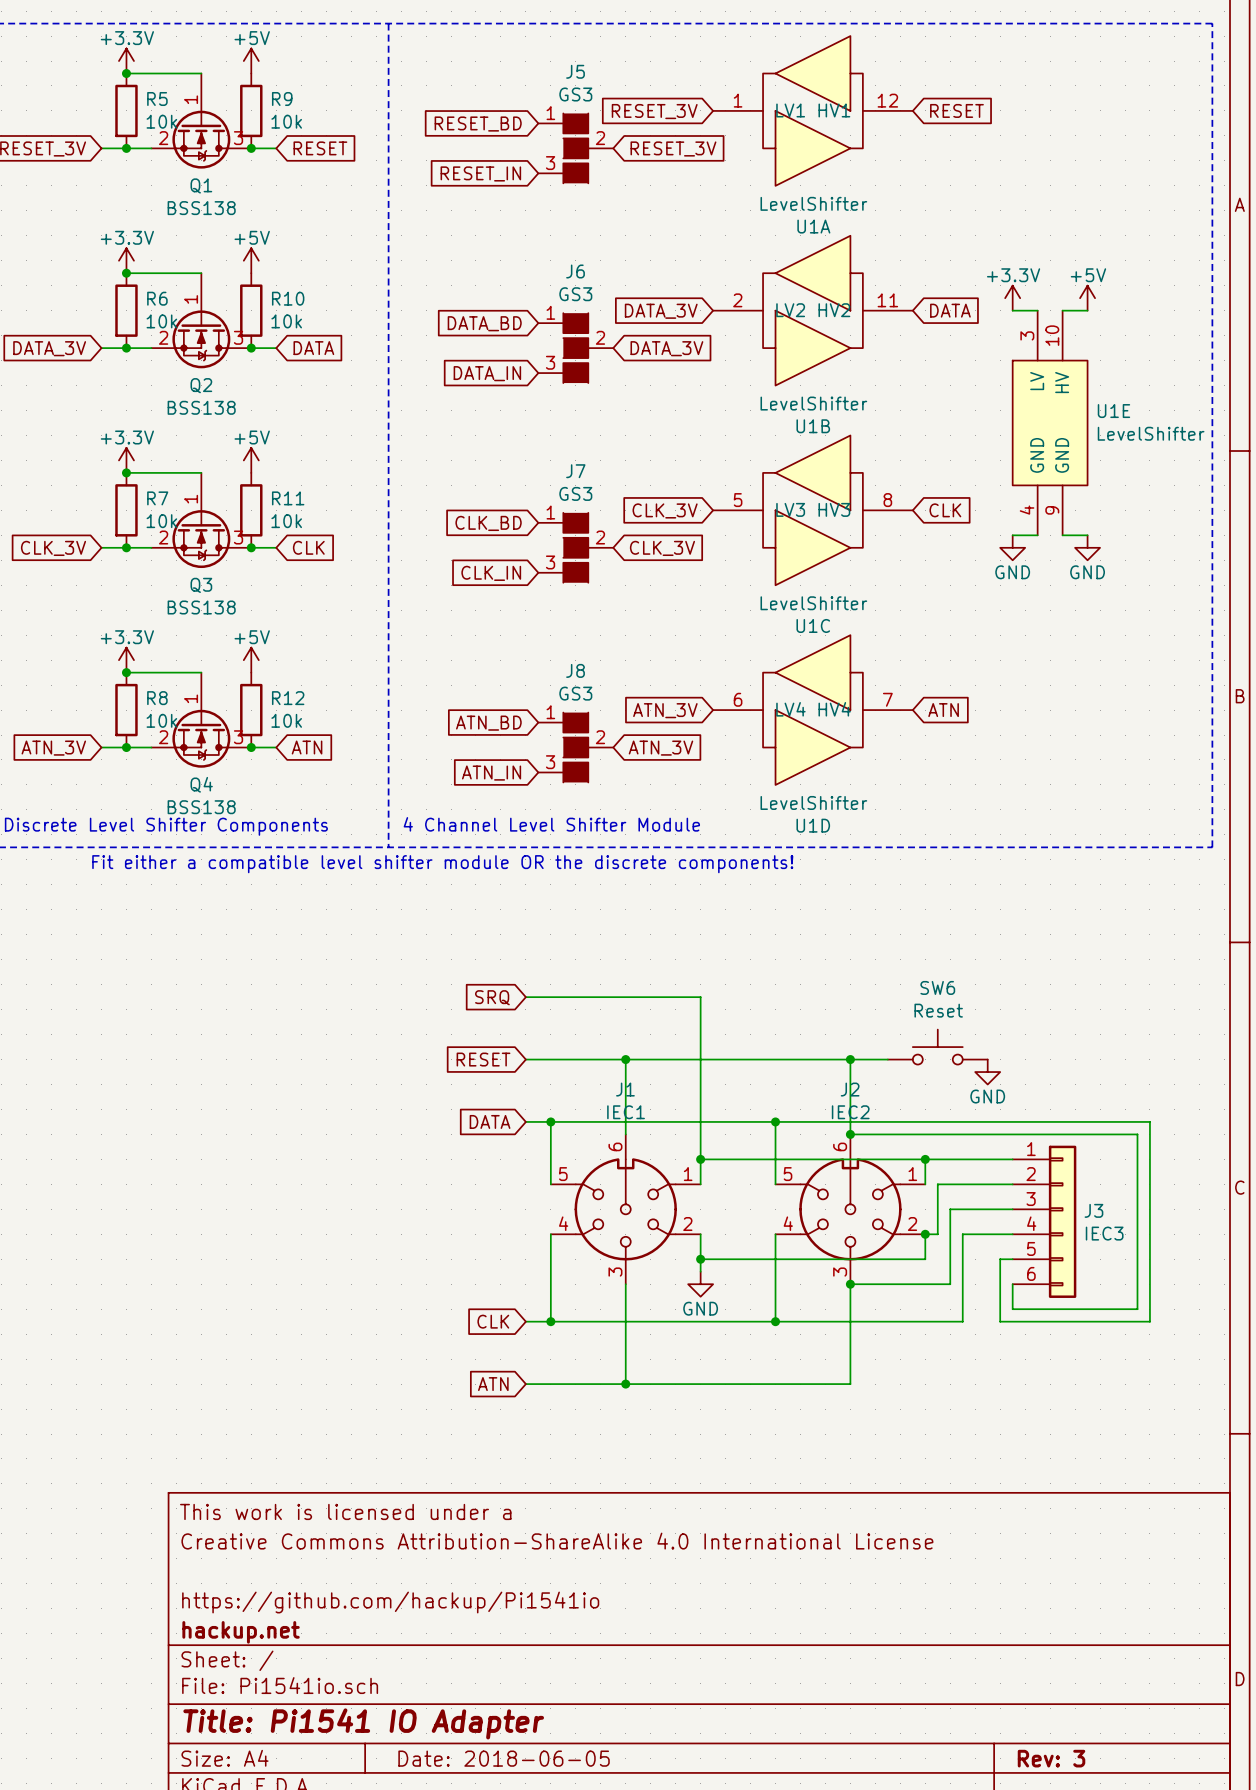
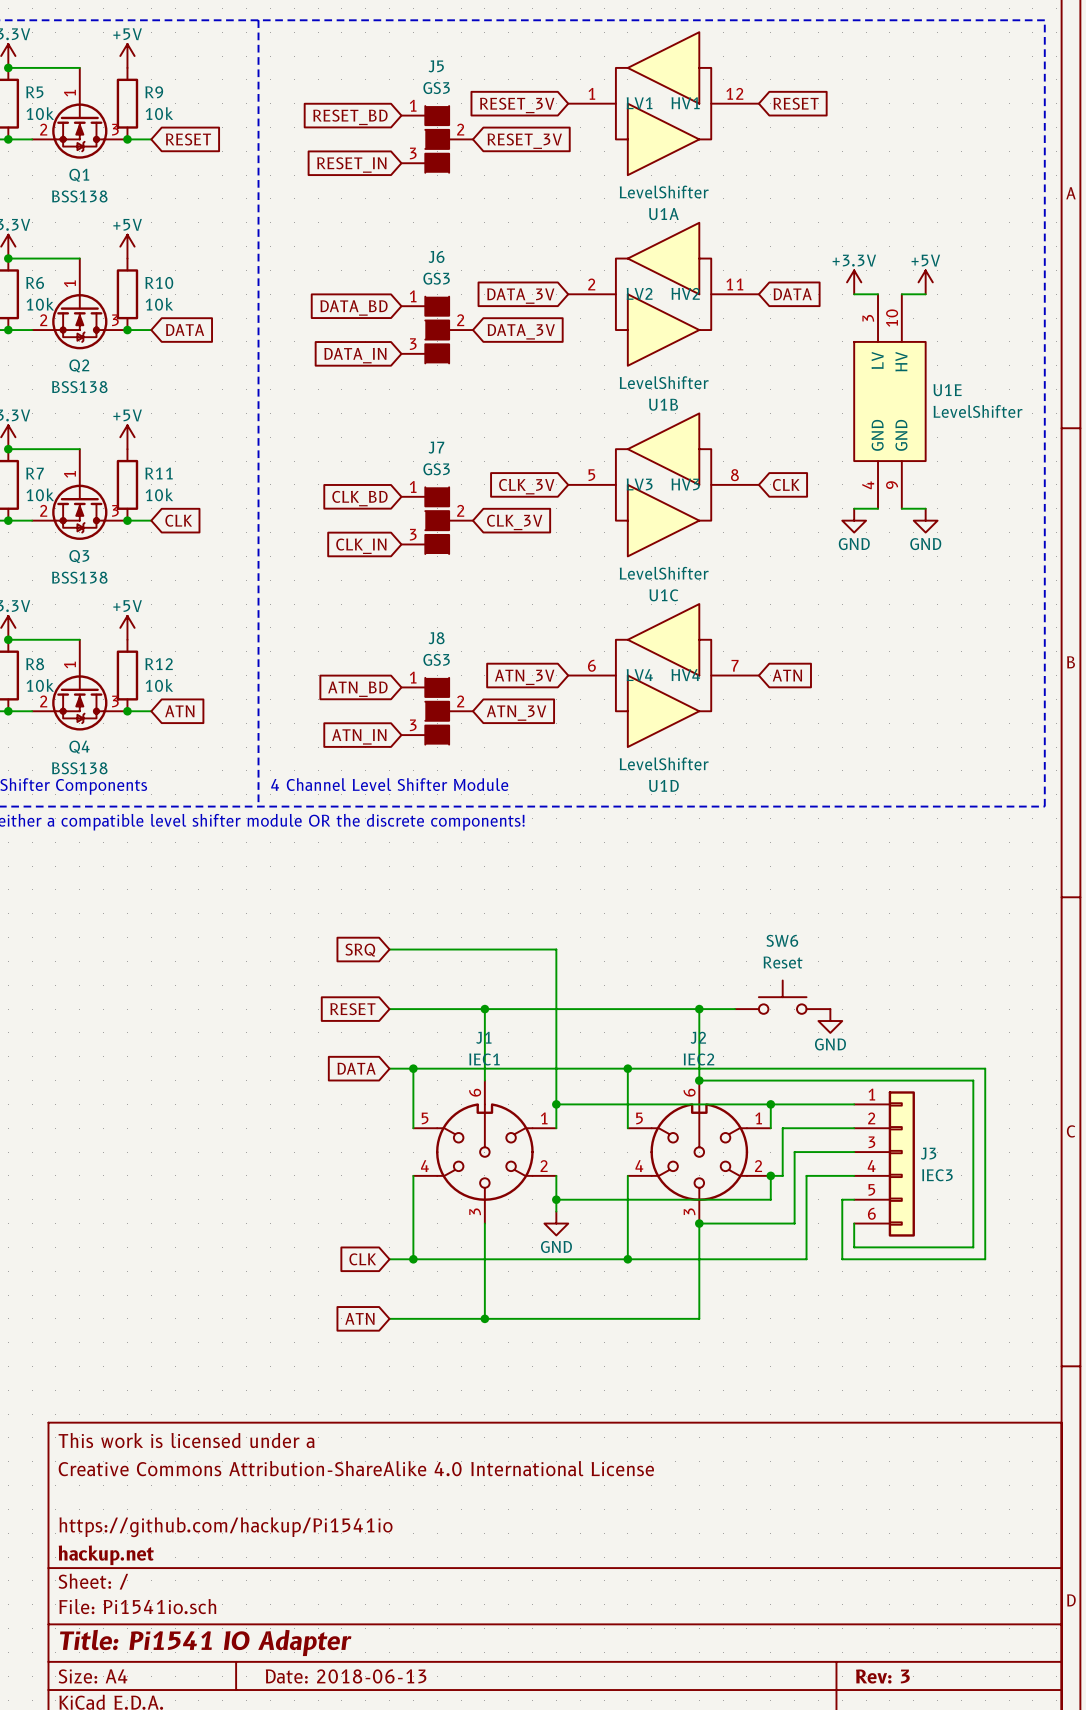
title block: Date: 2018-06-05 (504, 1758) -> Date: 2018-06-13 (346, 1676)

